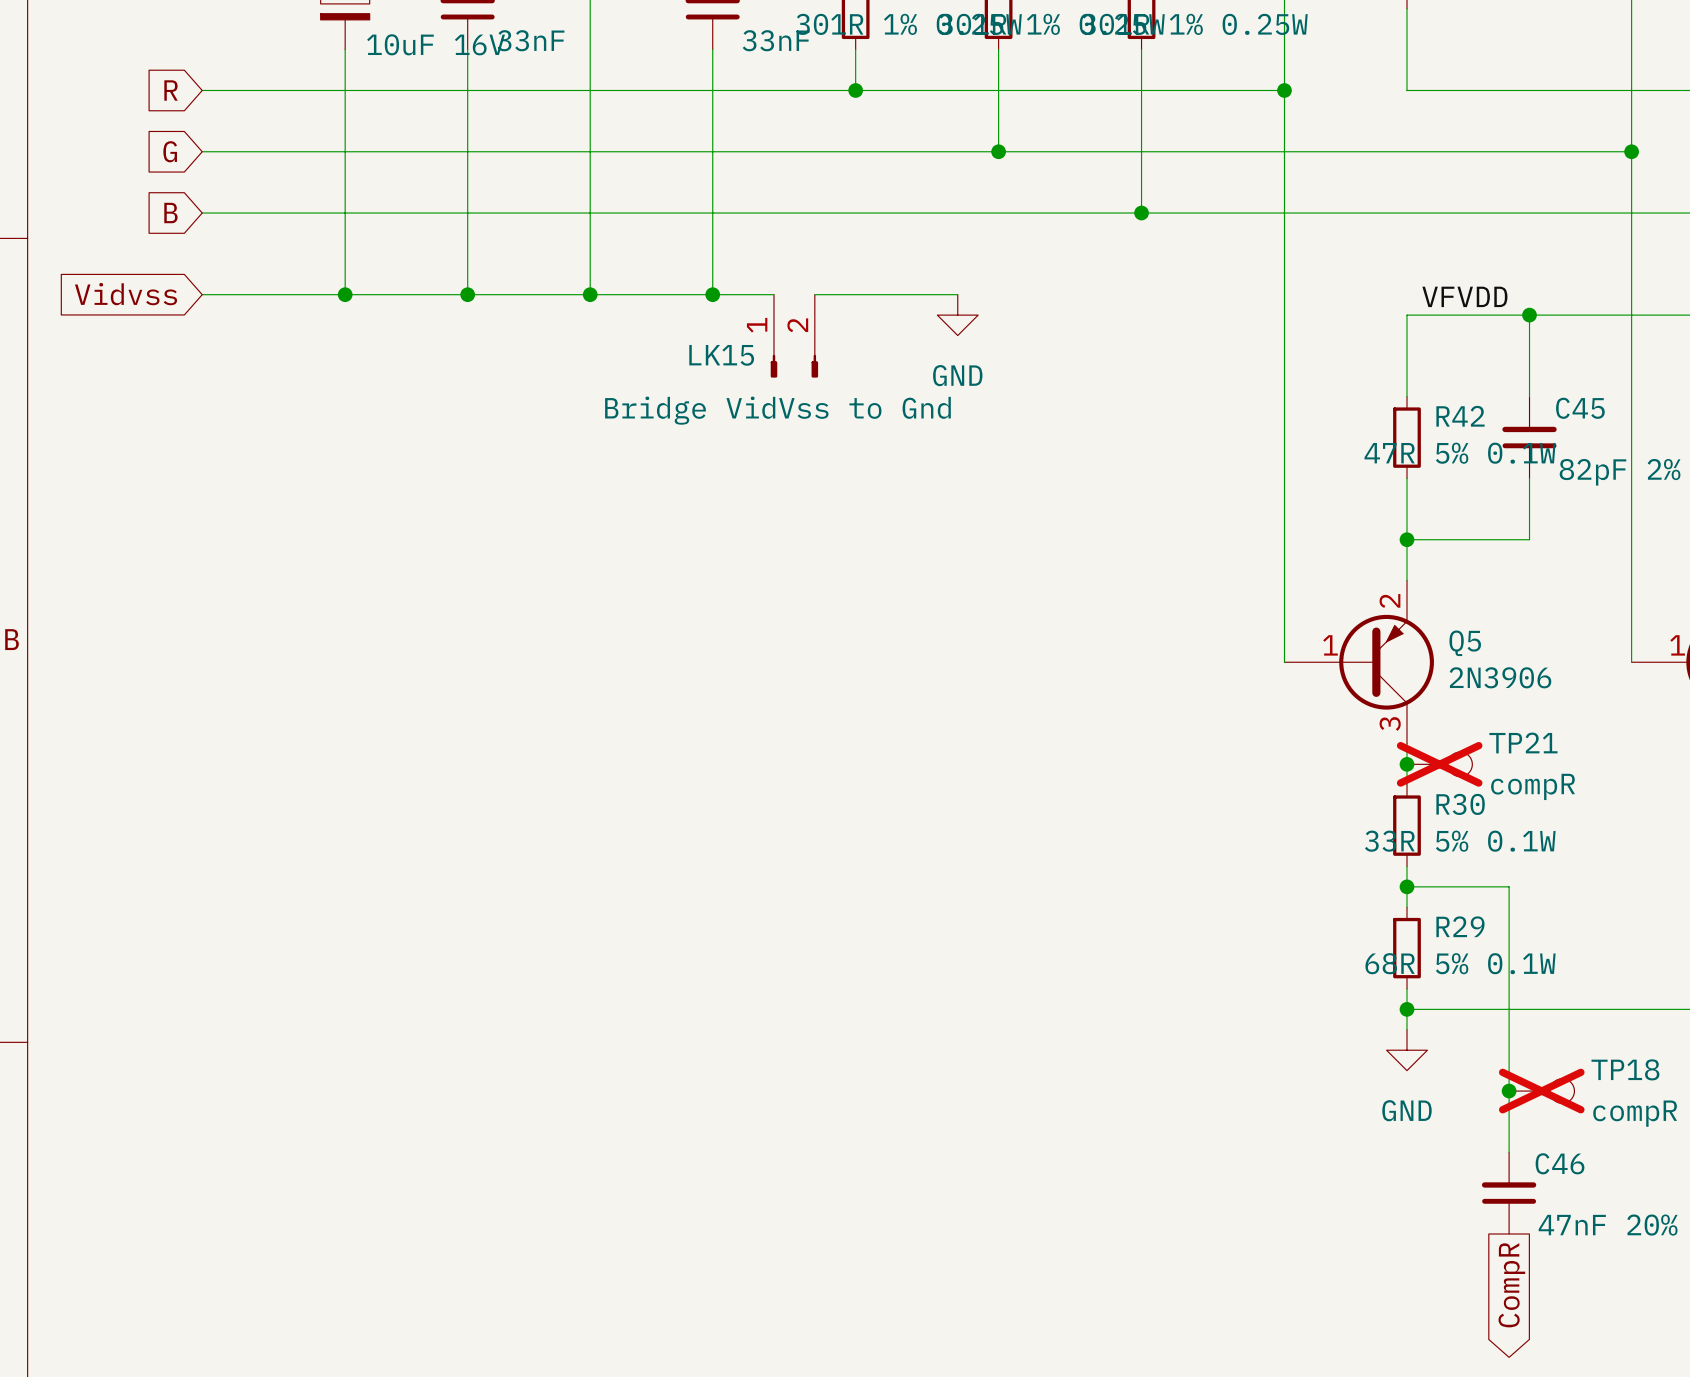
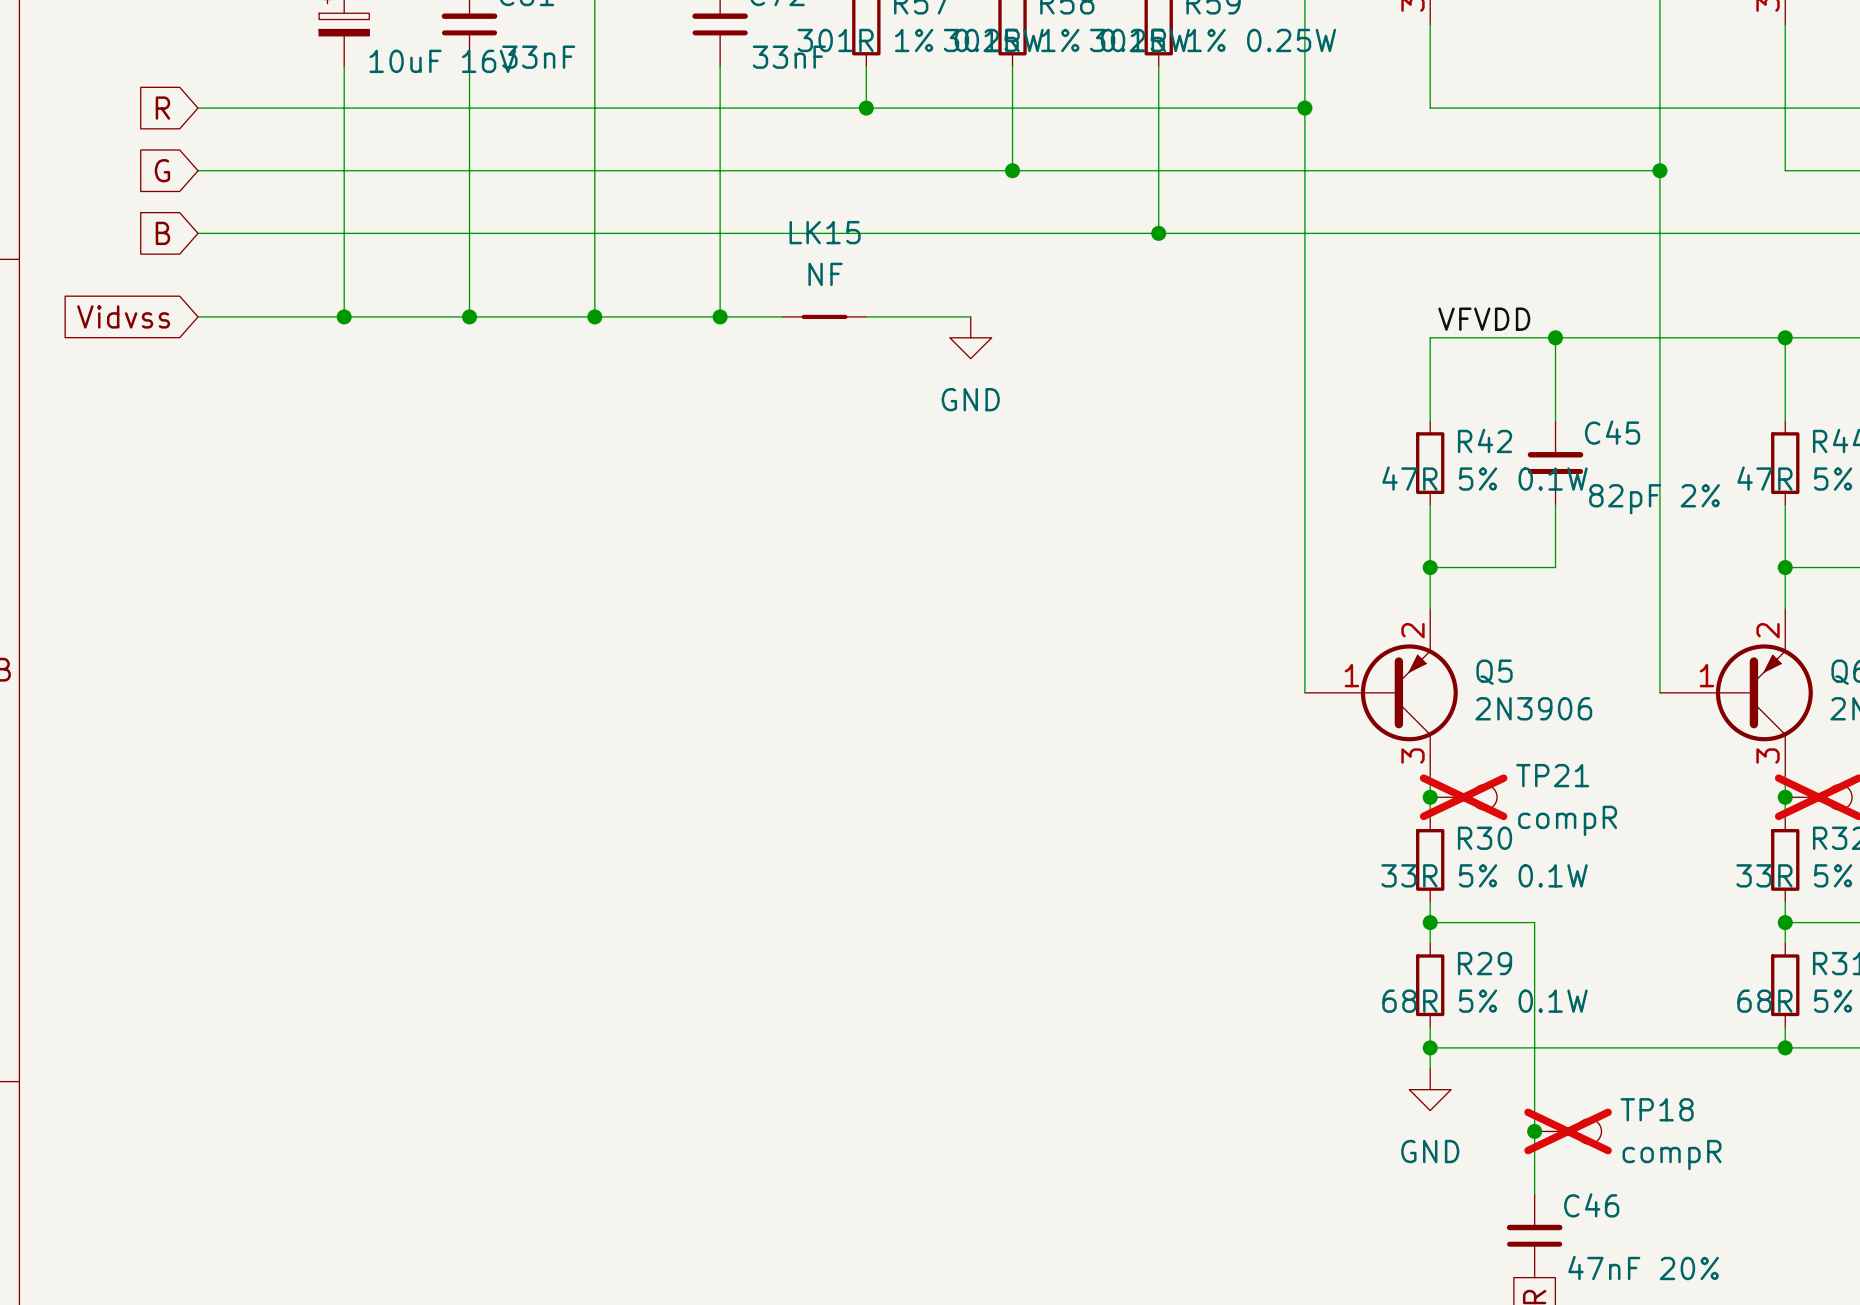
LK15 symbol: [770, 294, 819, 378] -> [782, 314, 867, 320]
LK15 name position: LK15 (721, 355) -> LK15 (825, 232)
LK15 value: Bridge VidVss to Gnd (777, 410) -> NF (825, 274)

